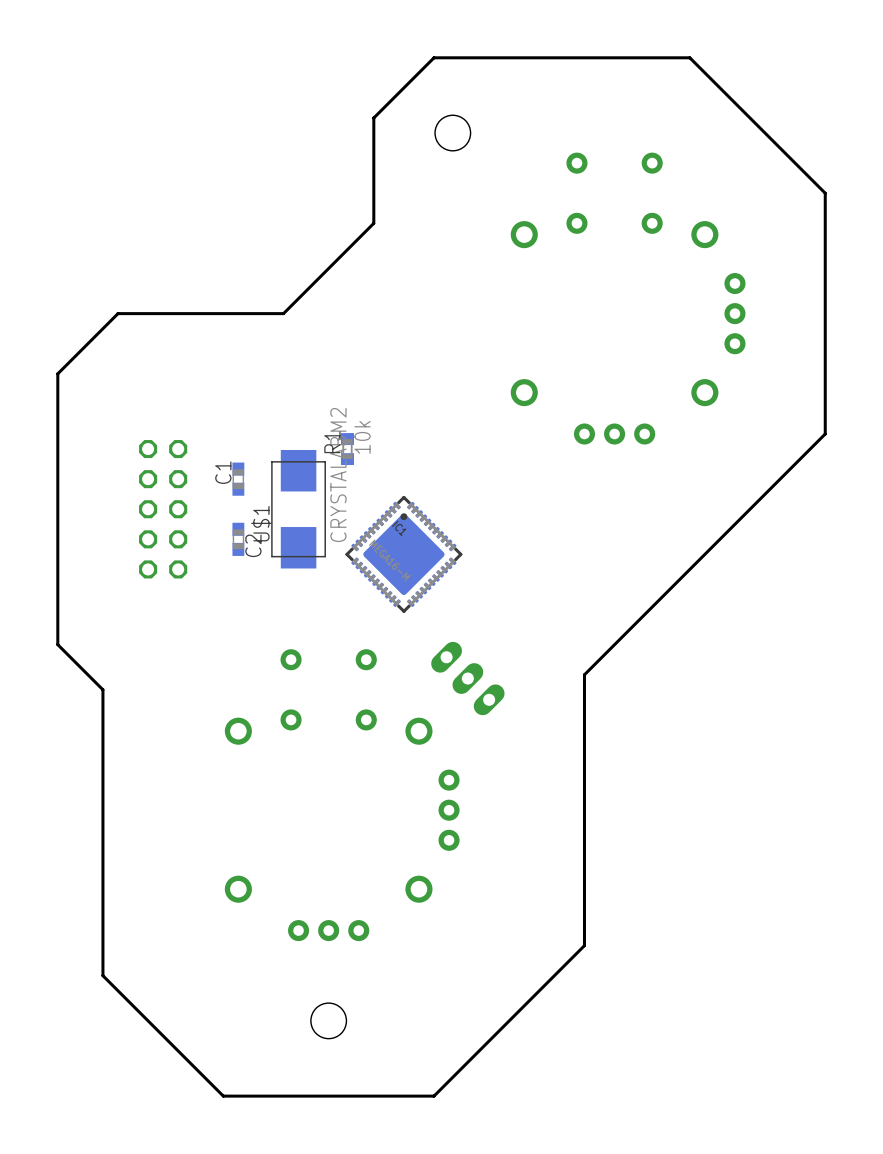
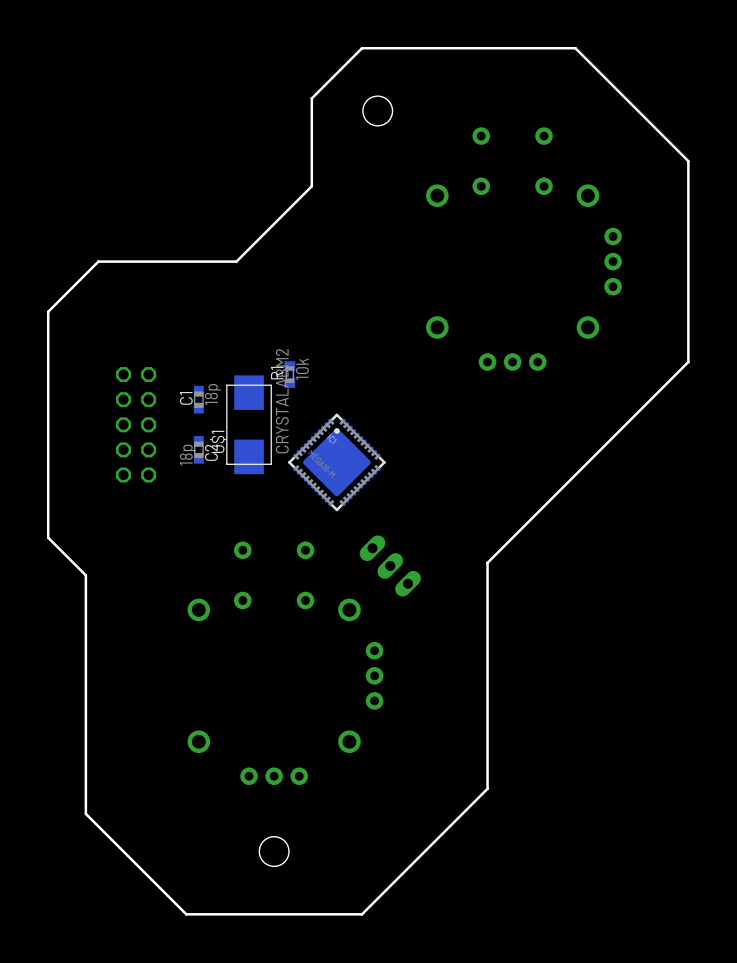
C1 value: none -> 18p (213, 394)
C2 value: none -> 18p (187, 455)

